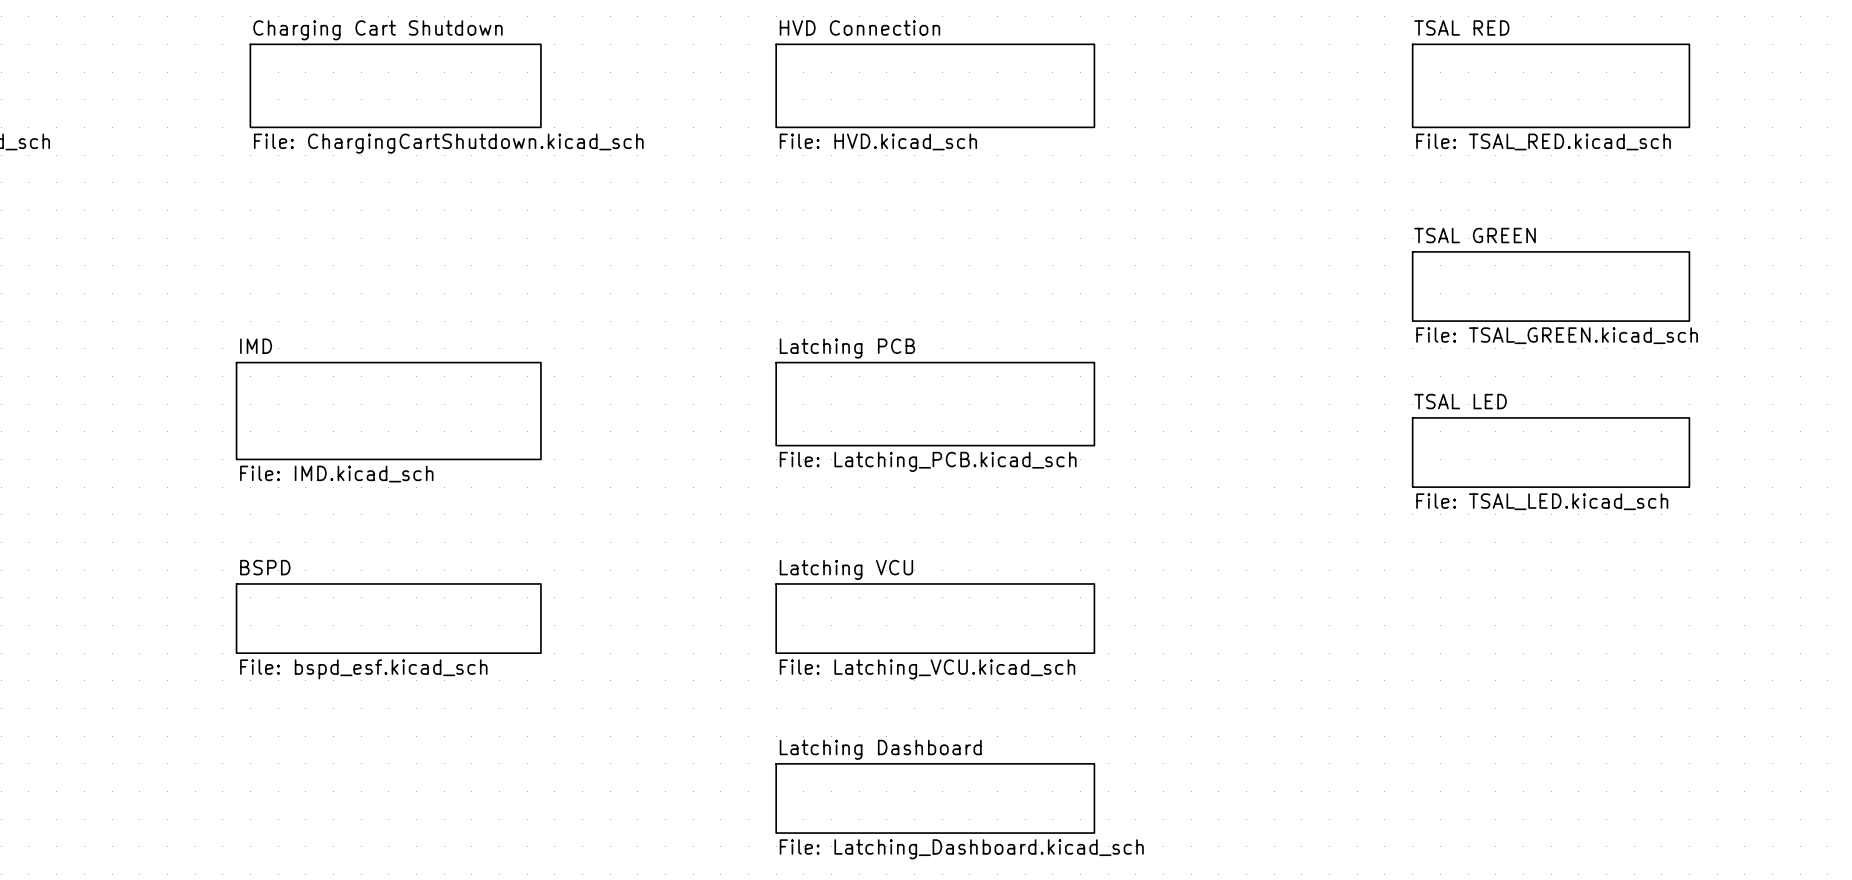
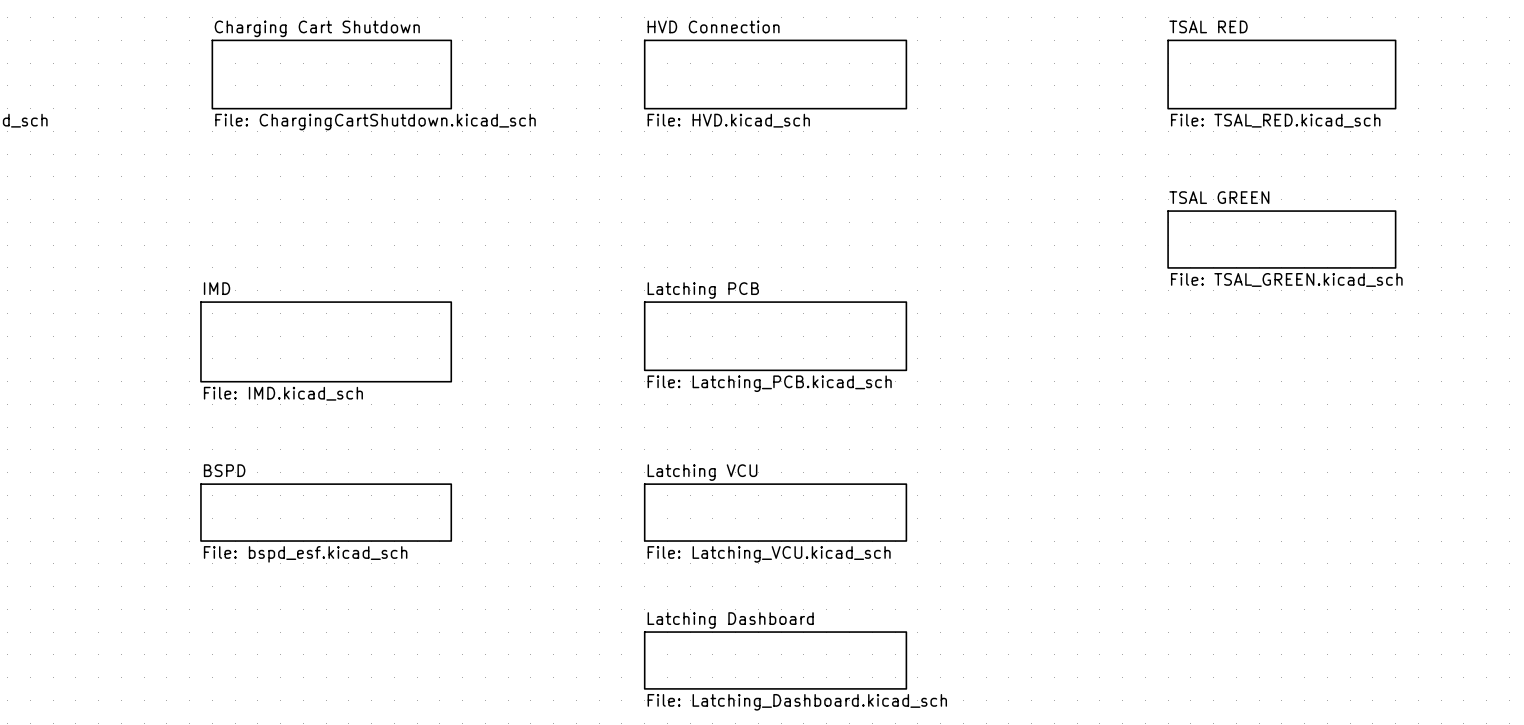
sheet TSAL LED: File: TSAL_LED.kicad_sch (1551, 452) -> none

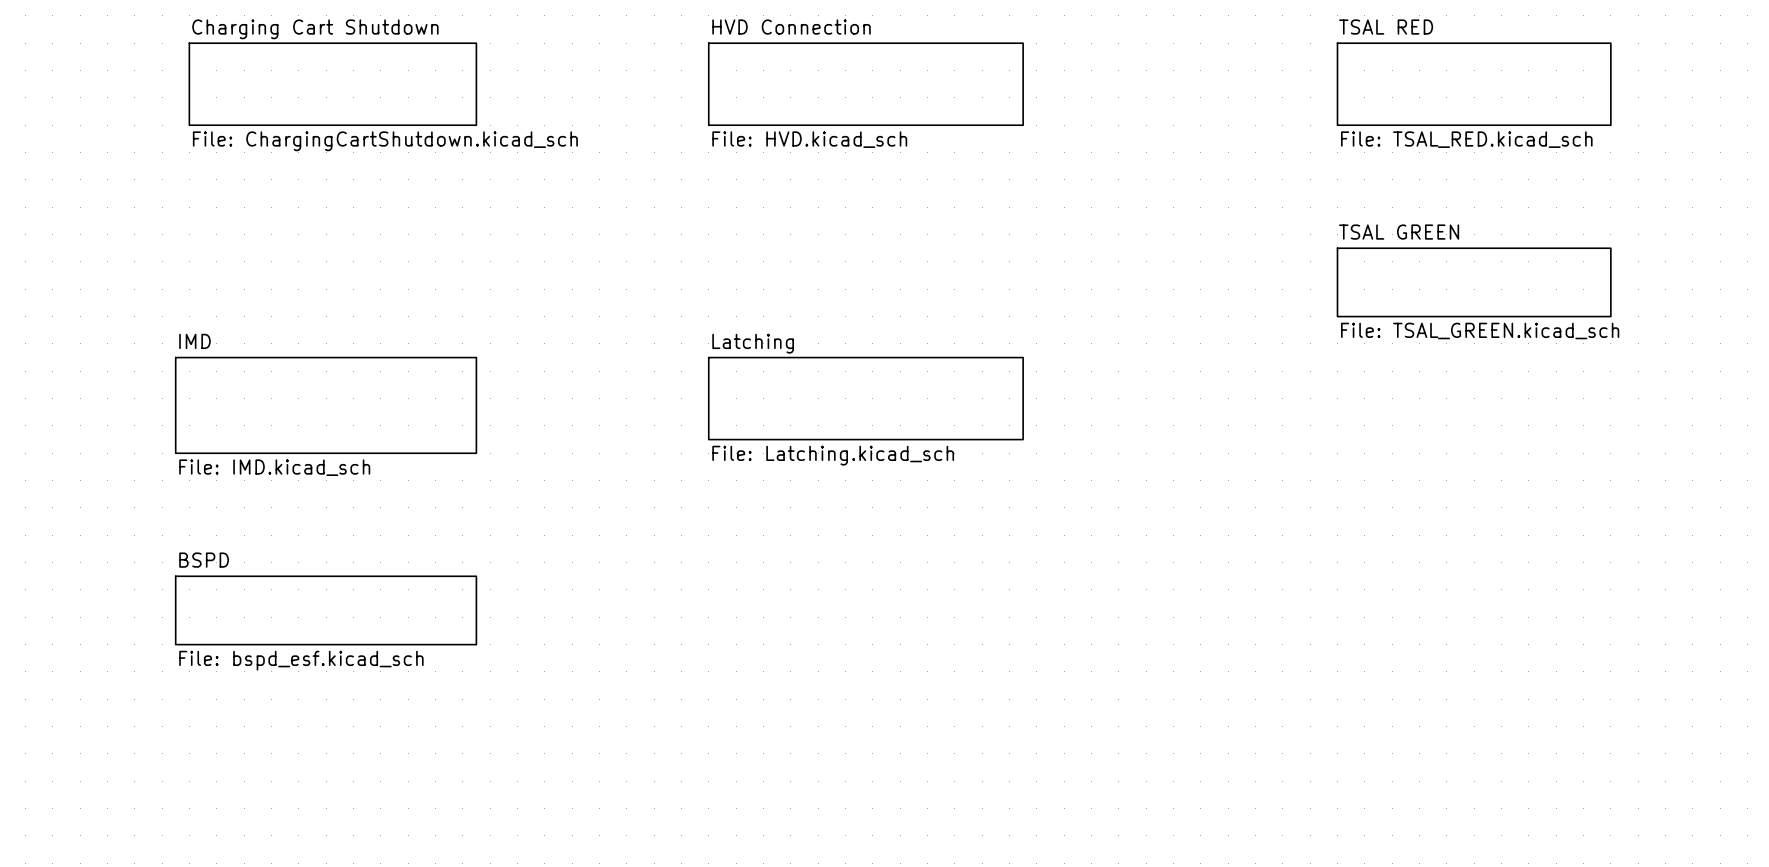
sheet Latching PCB name: Latching PCB (703, 290) -> Latching (753, 343)
sheet Latching PCB value: File: Latching_PCB.kicad_sch (769, 383) -> File: Latching.kicad_sch (833, 455)
sheet Latching VCU: File: Latching_VCU.kicad_sch (775, 512) -> none
sheet Latching Dashboard: File: Latching_Dashboard.kicad_sch (775, 660) -> none

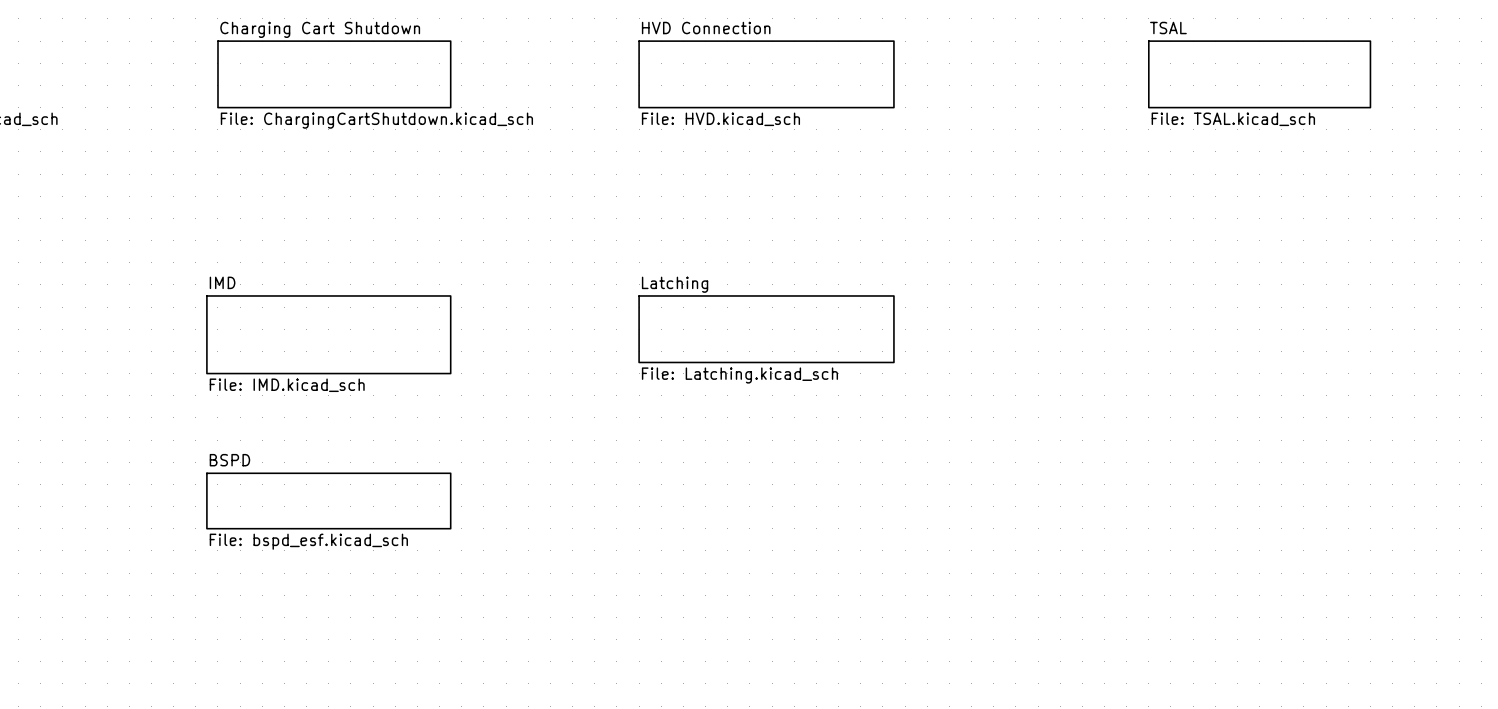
sheet TSAL RED name: TSAL RED (1386, 27) -> TSAL (1168, 28)
sheet TSAL RED value: File: TSAL_RED.kicad_sch (1466, 139) -> File: TSAL.kicad_sch (1233, 119)
sheet TSAL GREEN: File: TSAL_GREEN.kicad_sch (1474, 282) -> none

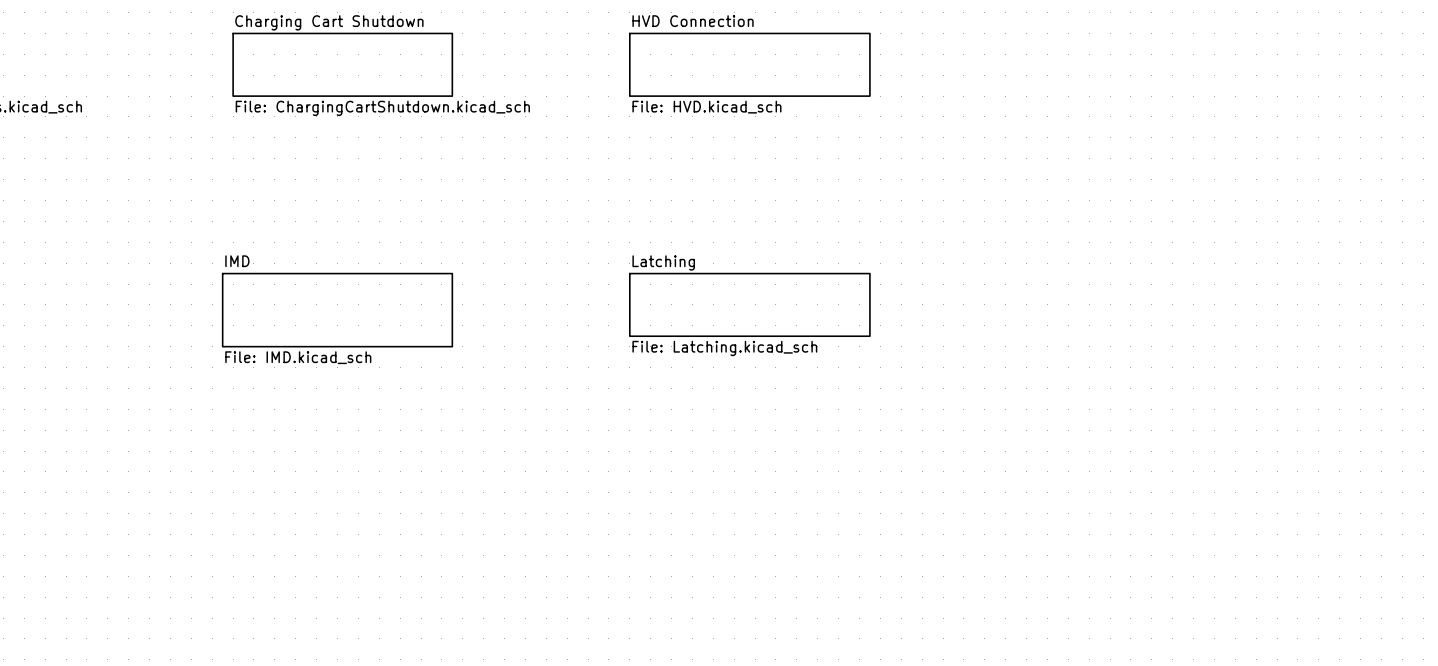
sheet TSAL: File: TSAL.kicad_sch (1259, 74) -> none
sheet BSPD: File: bspd_esf.kicad_sch (328, 500) -> none

